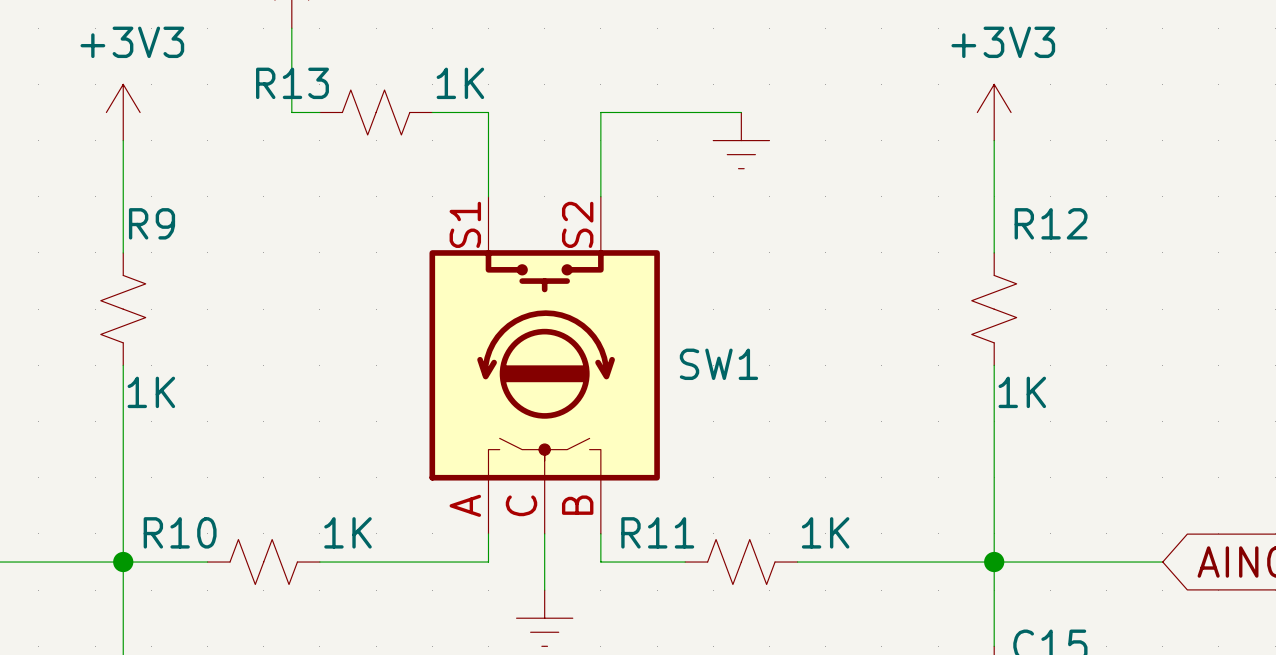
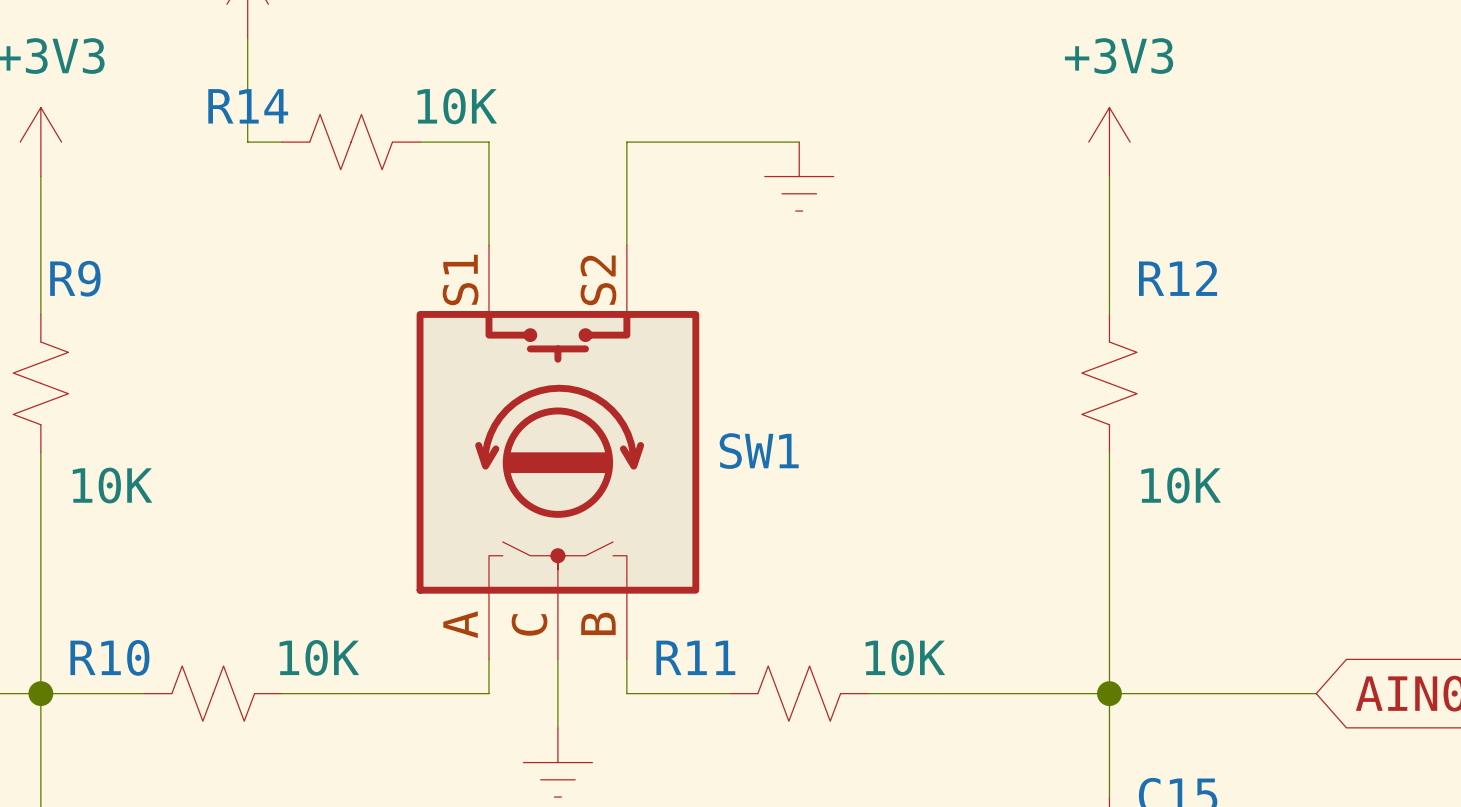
R13 name: R13 (292, 83) -> R14 (248, 106)
R13 value: 1K (460, 83) -> 10K (457, 106)
R9 value: 1K (151, 392) -> 10K (112, 485)
R12 value: 1K (1022, 392) -> 10K (1181, 485)
R10 value: 1K (348, 532) -> 10K (319, 657)
R11 value: 1K (825, 532) -> 10K (905, 657)

